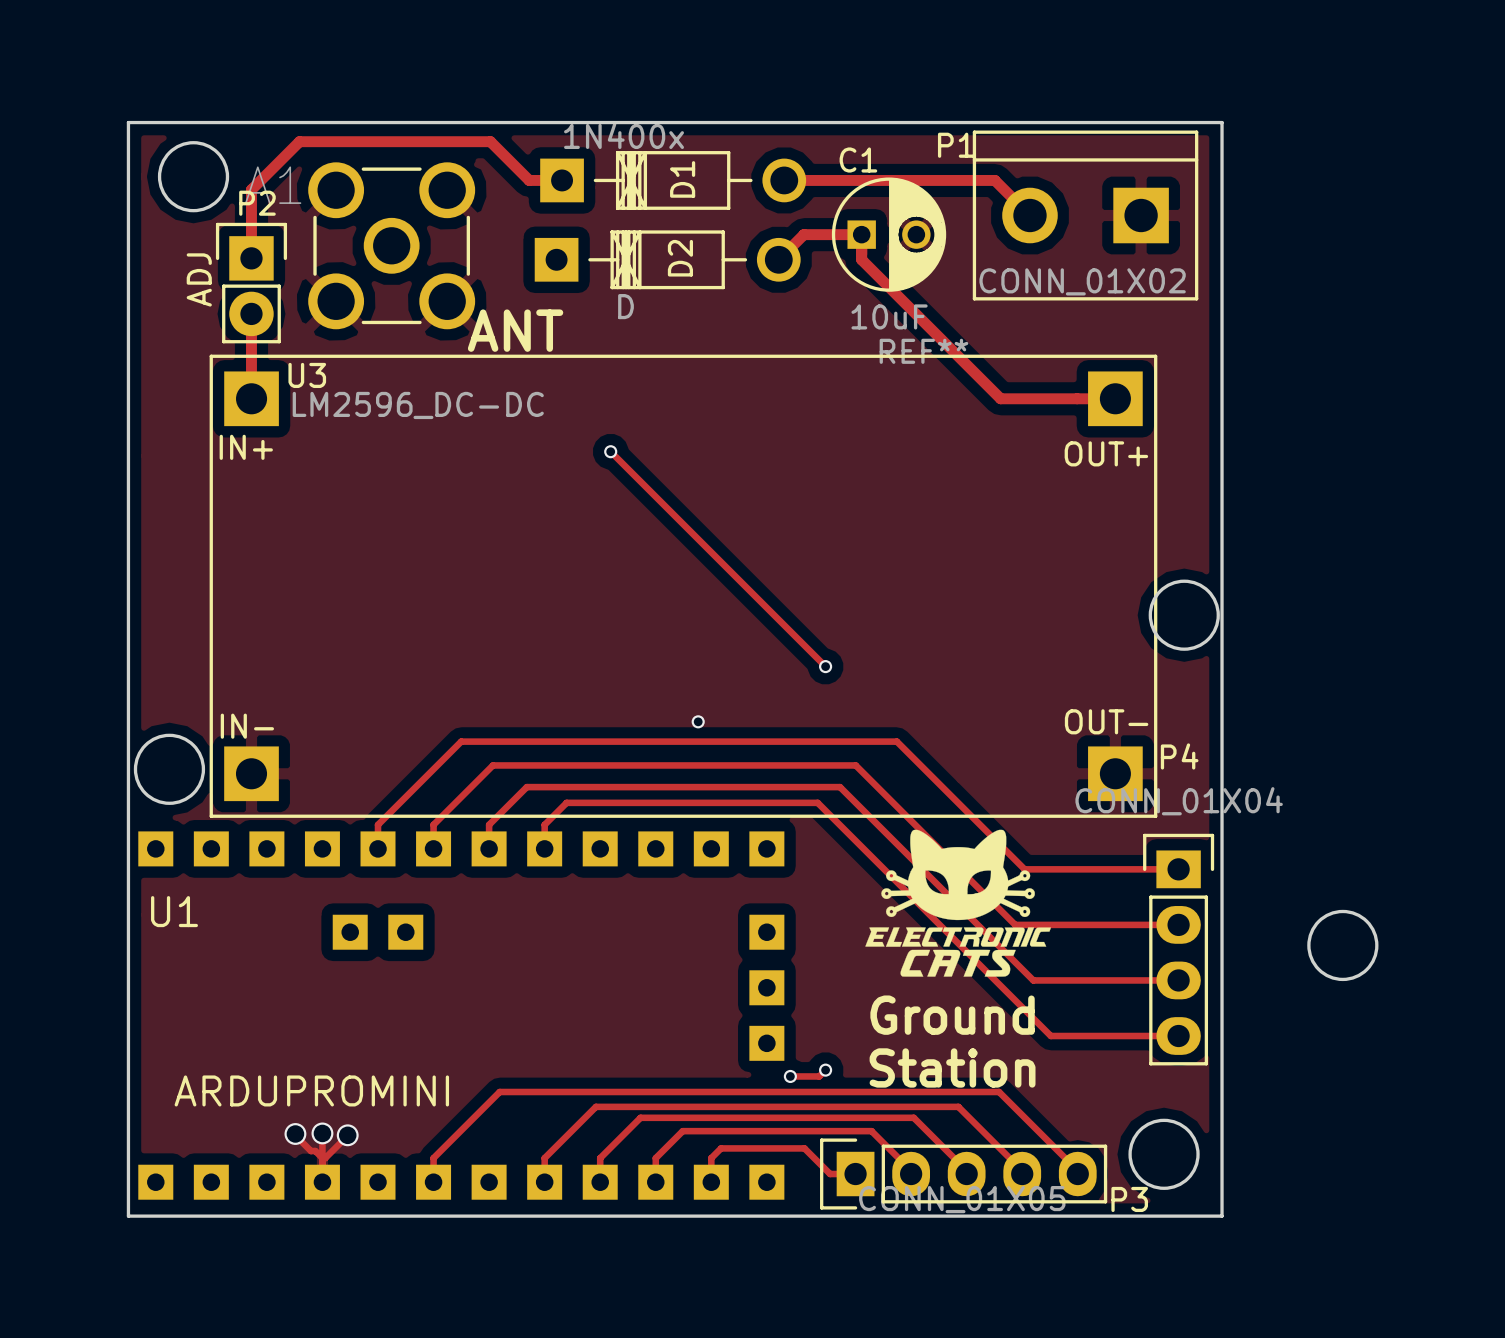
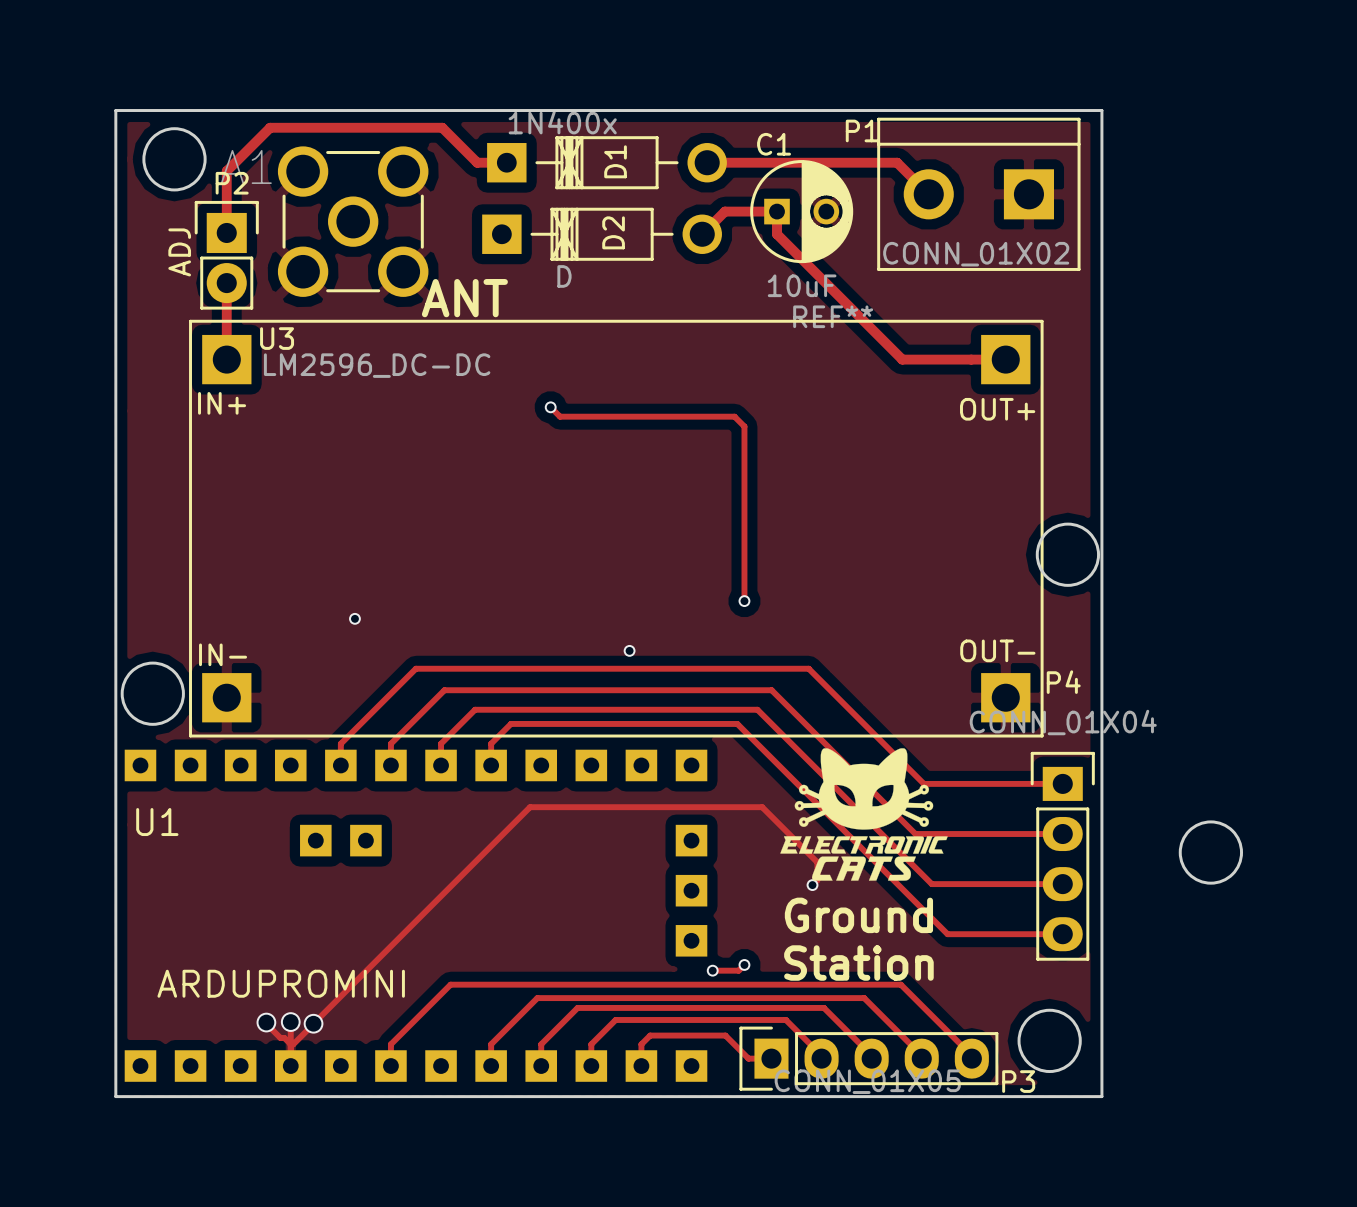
track: (621, 462) (825, 666) -> (560, 416) (734, 416) (744, 426) (744, 601)
via: none -> (354, 618)
track: none -> (812, 885) (817, 880) (817, 862) (762, 807) (530, 807) (313, 1023)
via: none -> (812, 885)

